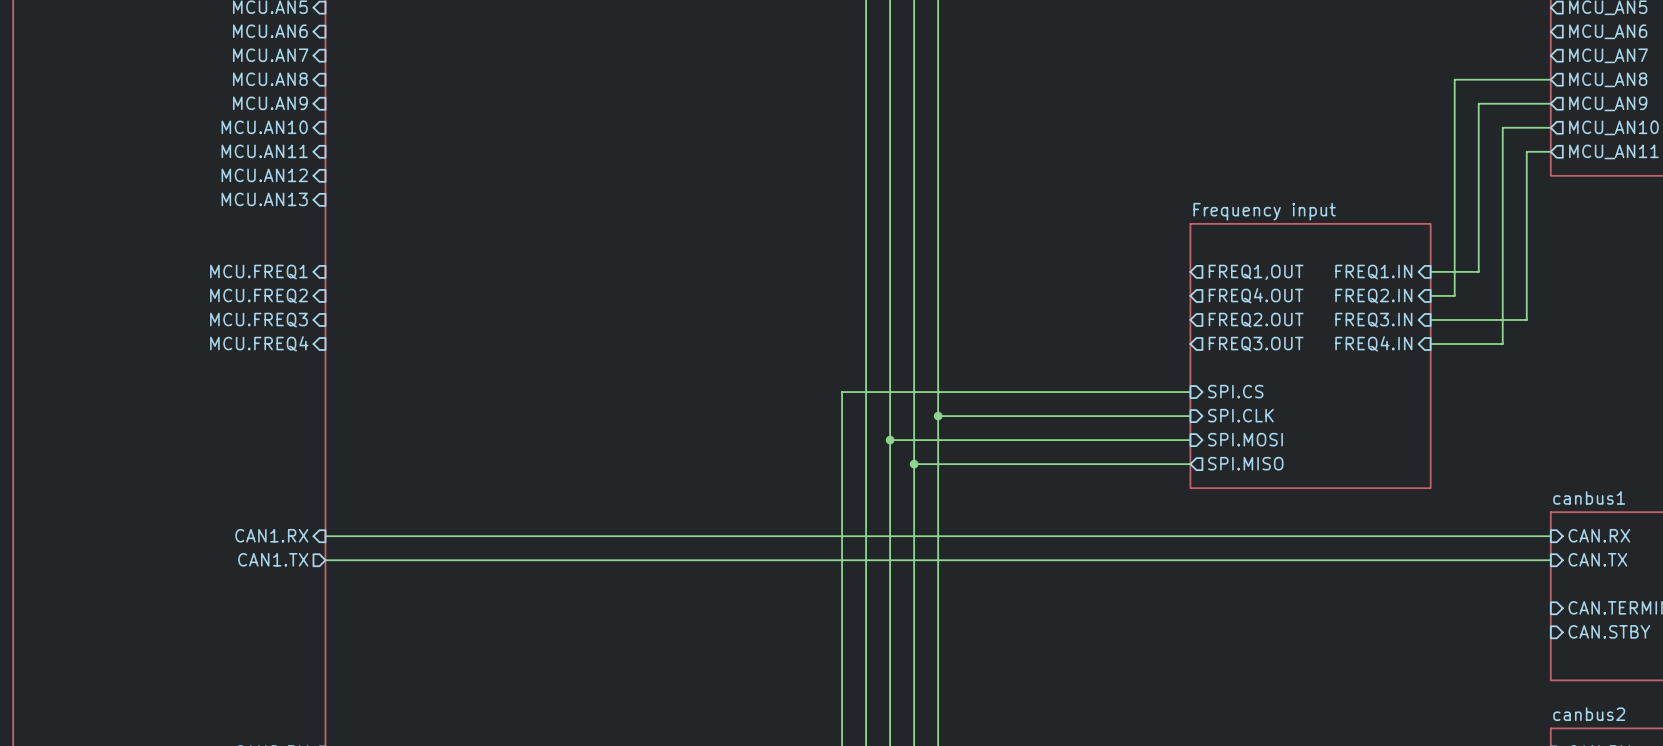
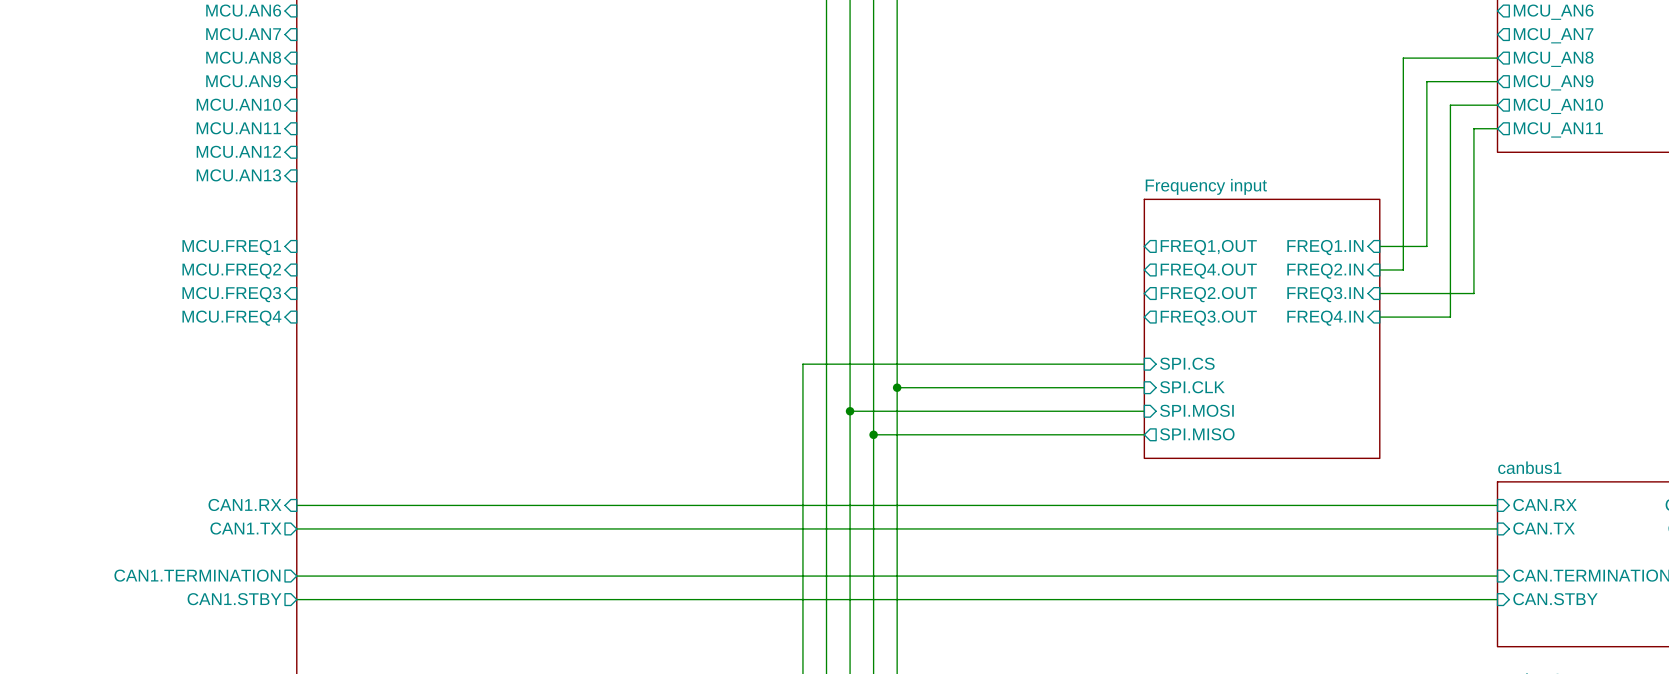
sheet pin: none -> CAN1.TERMINATION (197, 575)
wire: none -> (296, 576) (1497, 576)
sheet pin: none -> CAN1.STBY (234, 599)
wire: none -> (296, 599) (1497, 599)

